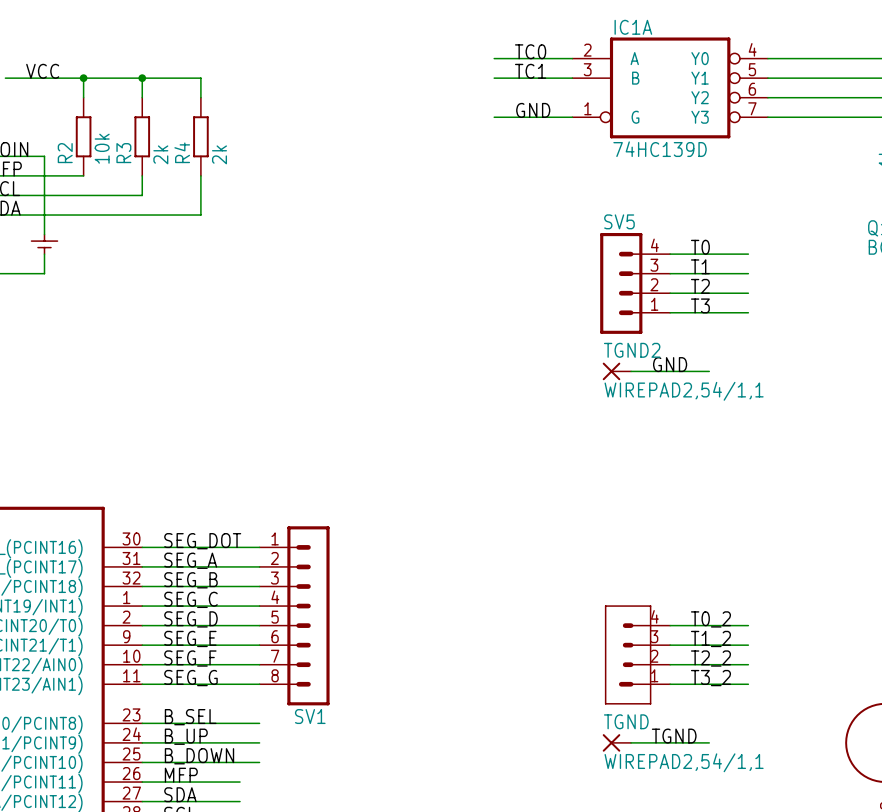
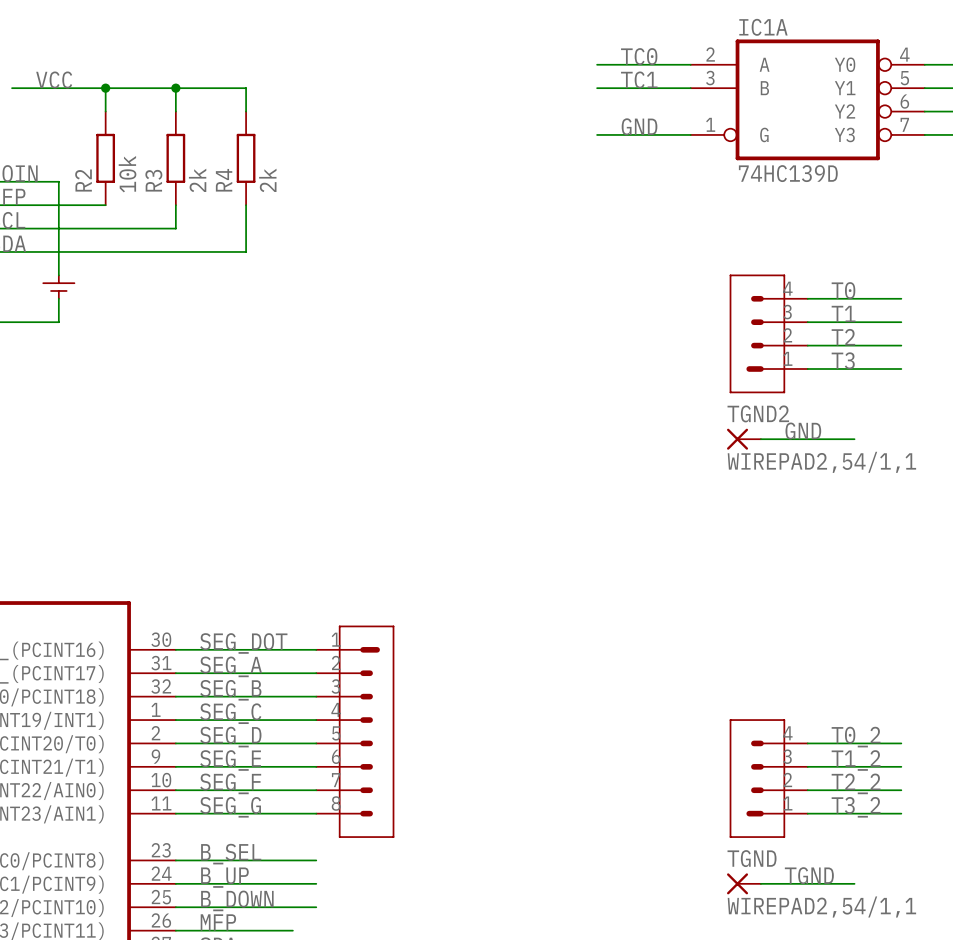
SV5: (635, 283) -> none
part: none -> (768, 333)
part: none -> (355, 731)
SV1: (294, 615) -> none

